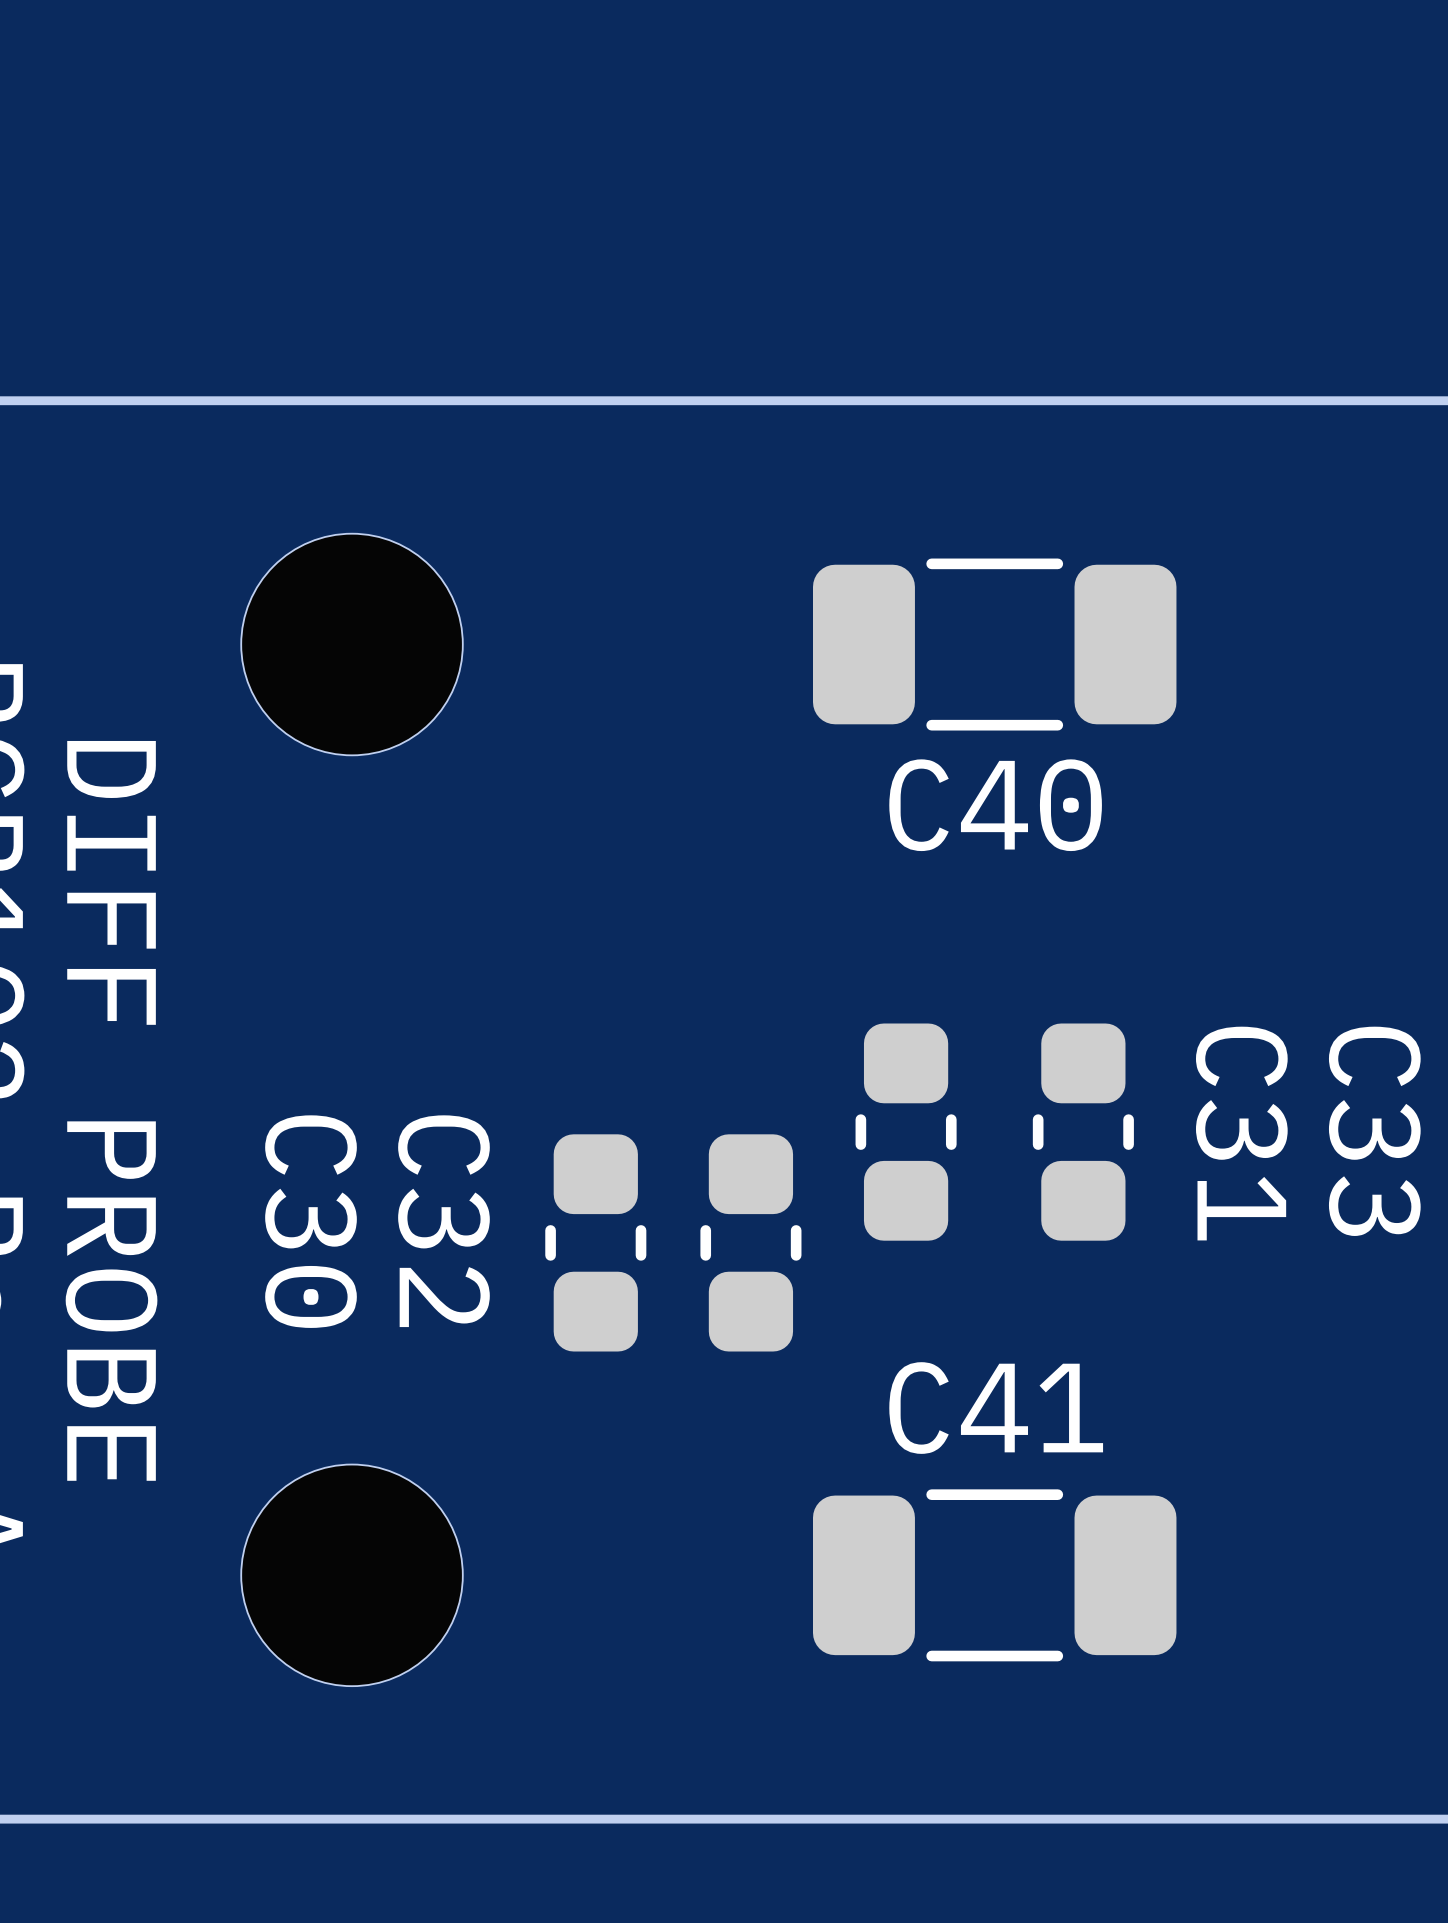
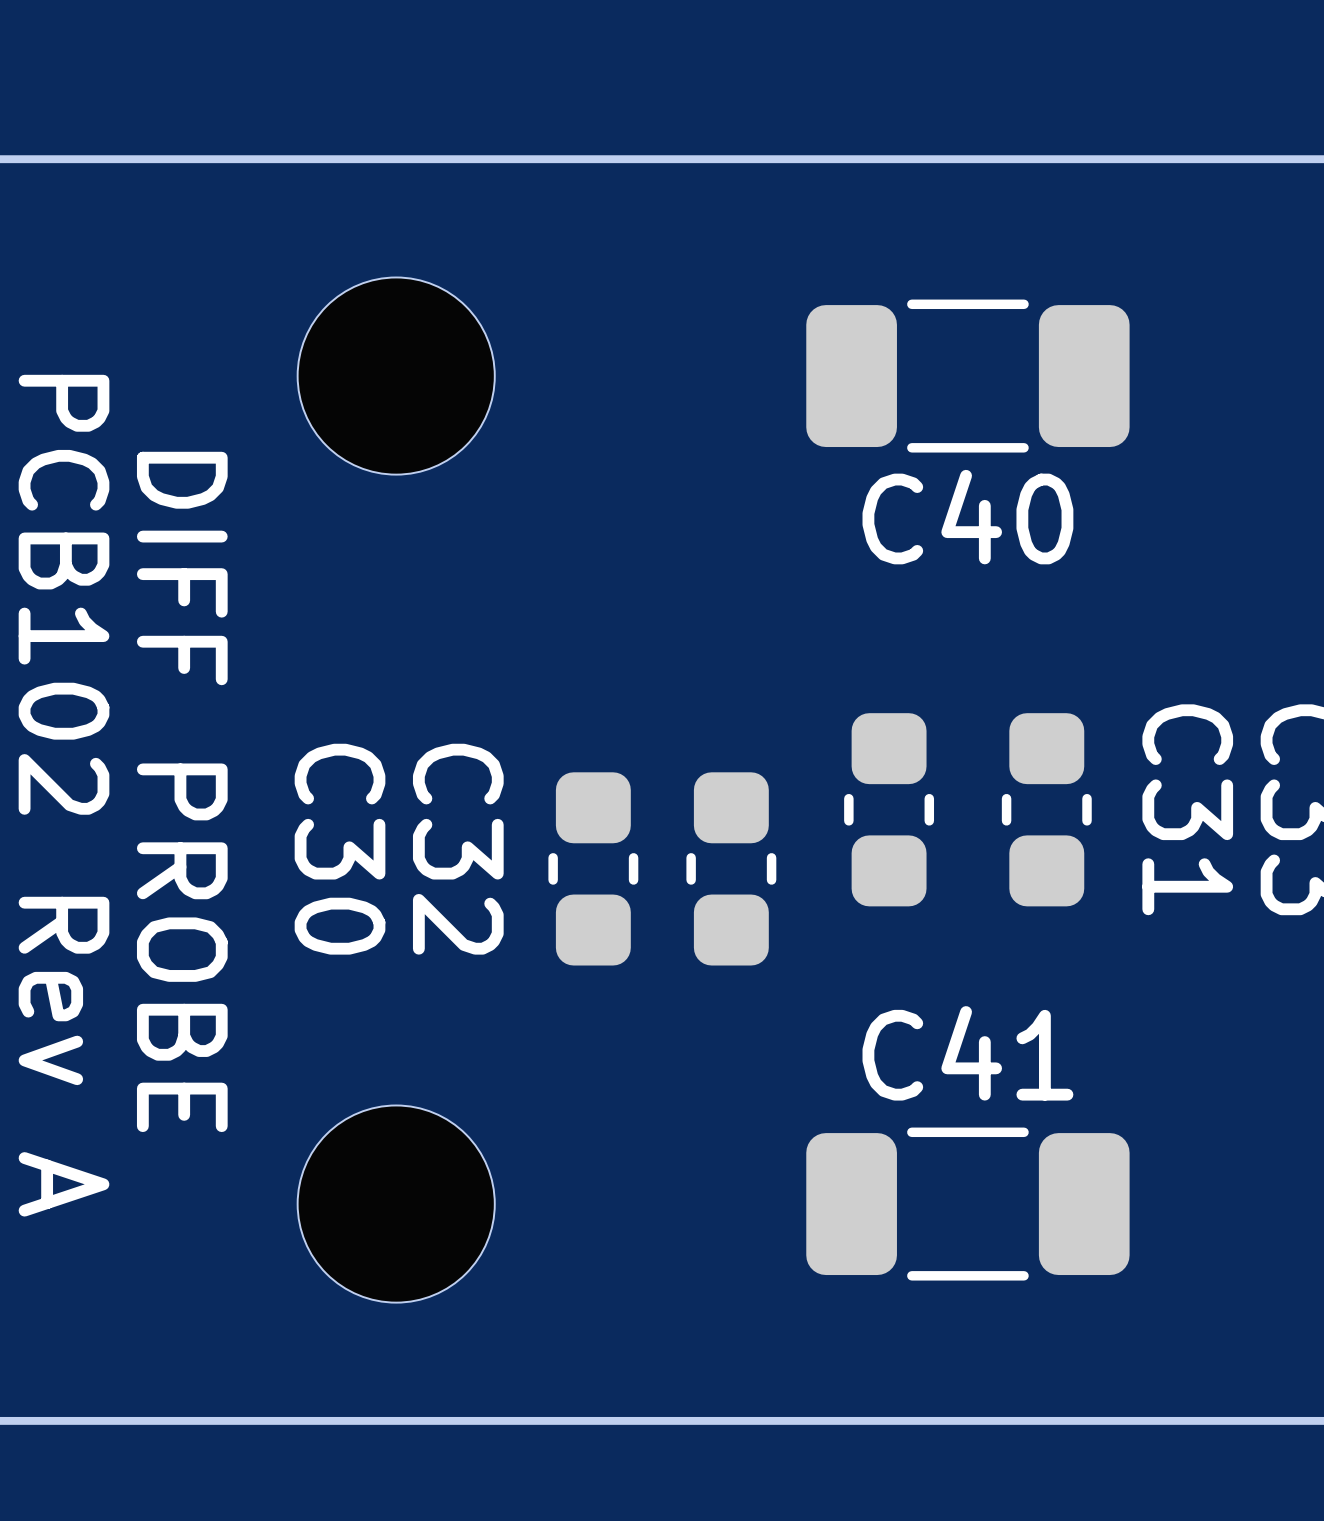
C30 position: (595, 1242) -> (593, 868)
C32 position: (750, 1242) -> (731, 868)

